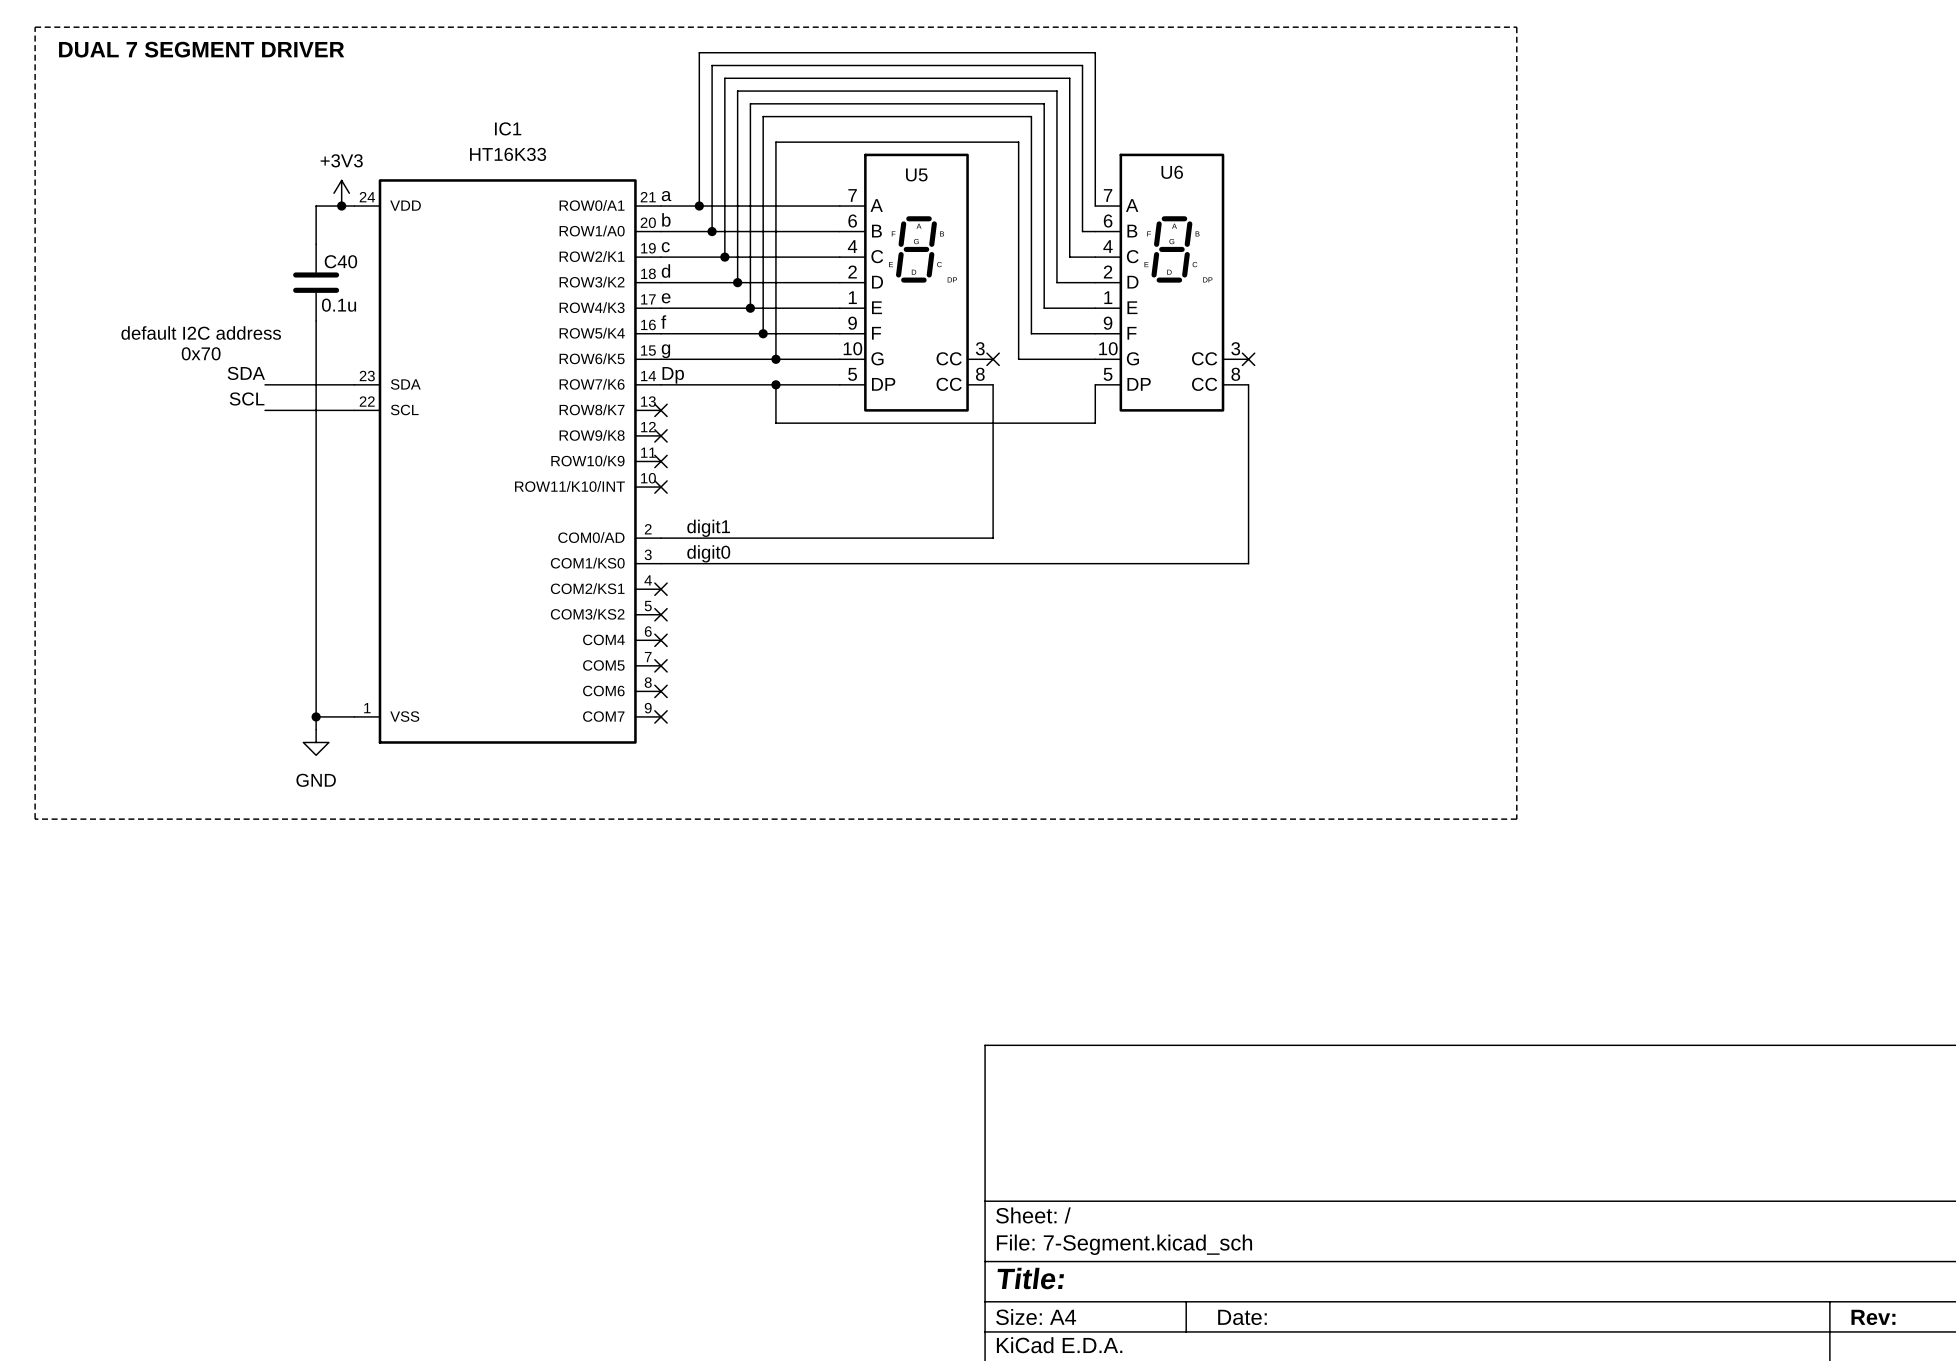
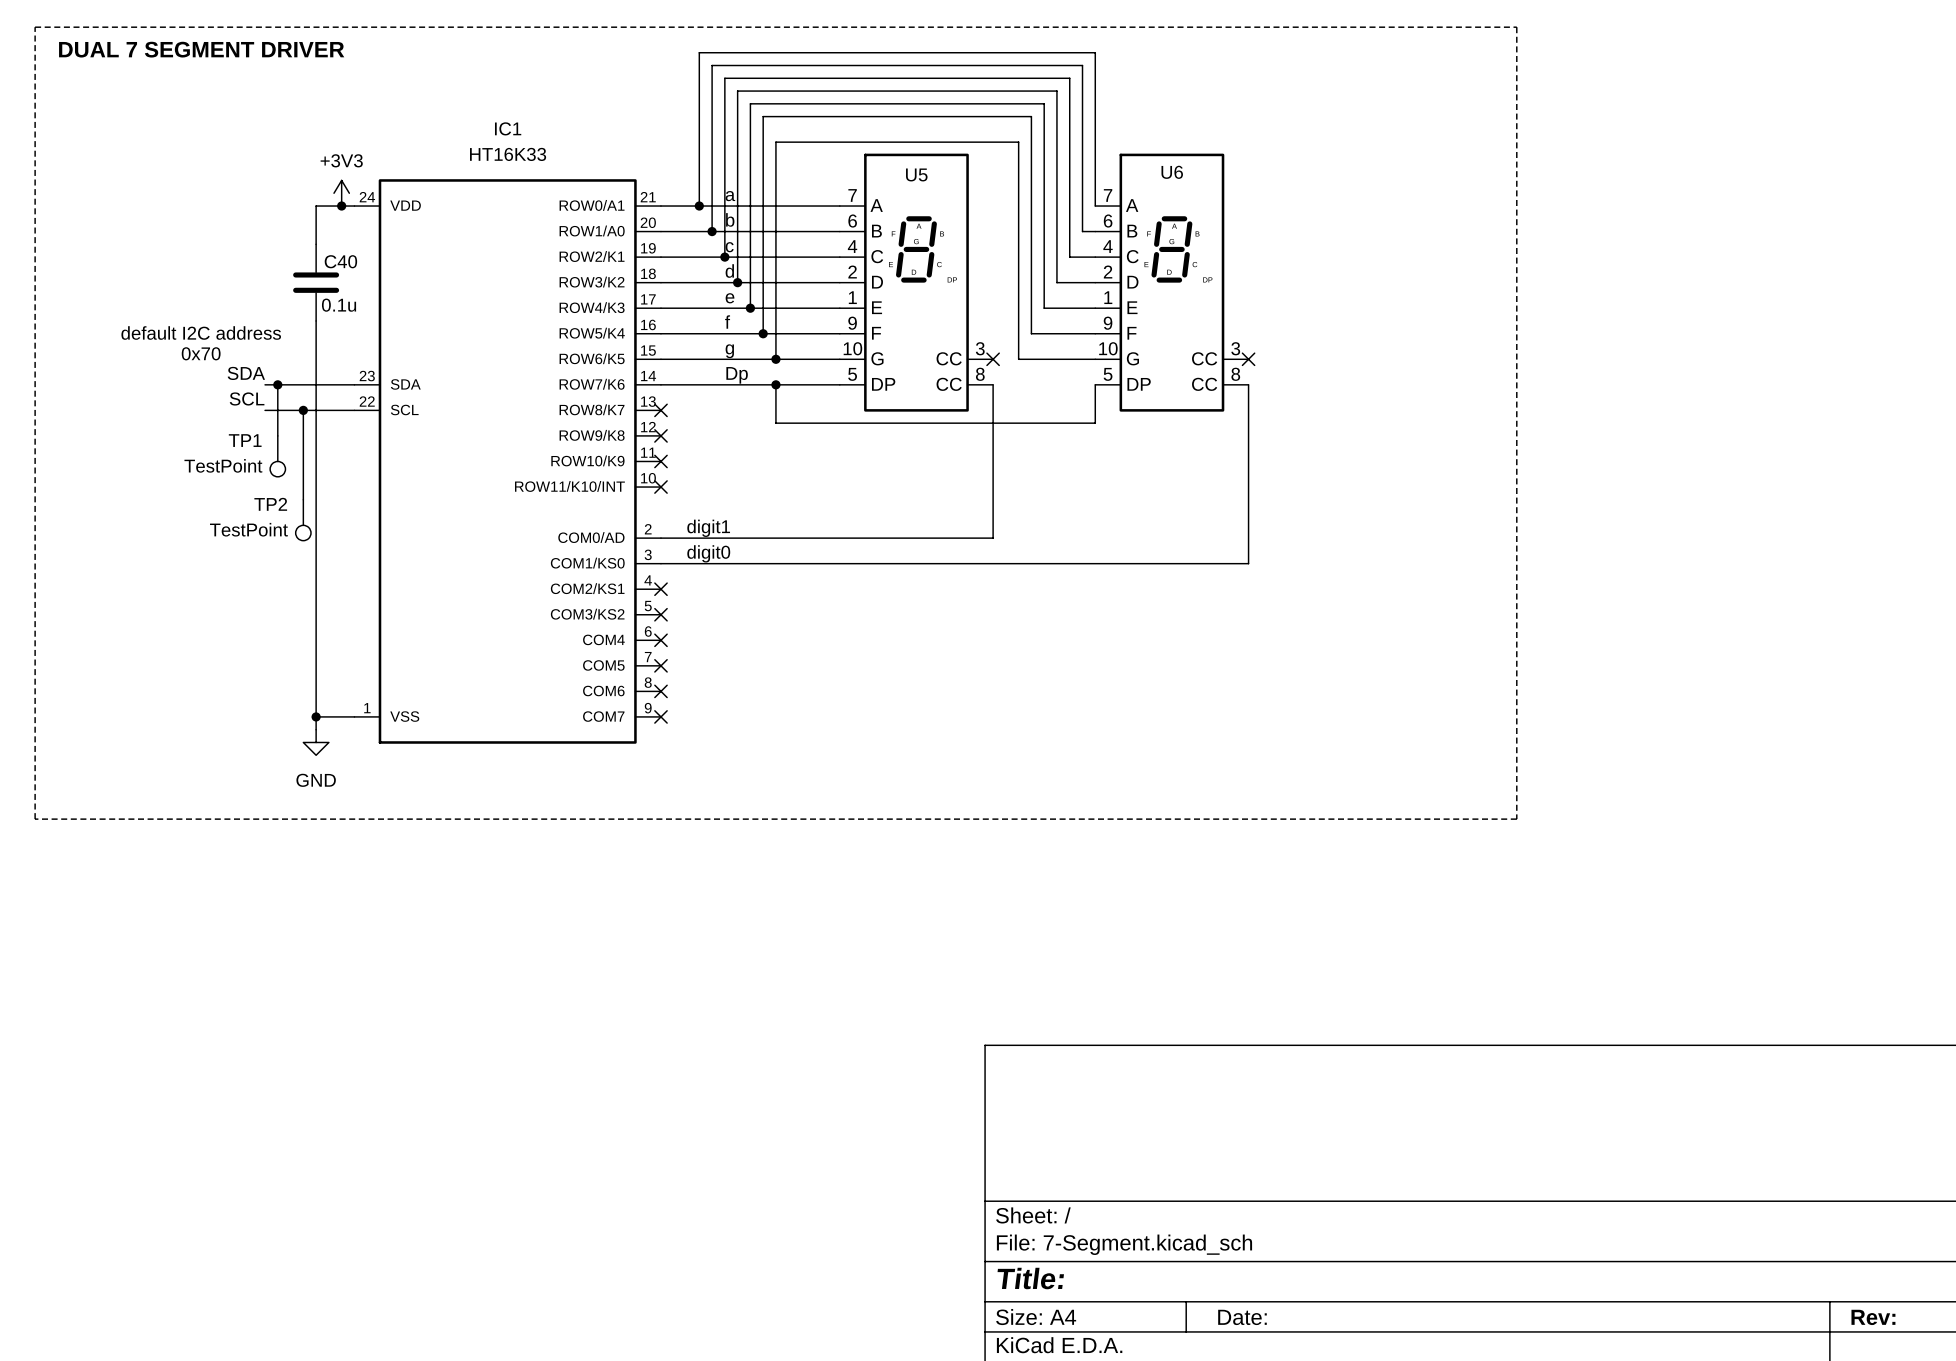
label position: a (666, 196) -> a (730, 196)
label position: b (666, 219) -> b (730, 219)
label position: c (665, 247) -> c (729, 247)
label position: d (665, 271) -> d (729, 271)
label position: e (666, 298) -> e (730, 298)
label position: f (663, 322) -> f (727, 322)
label position: g (665, 351) -> g (729, 351)
label position: Dp (673, 375) -> Dp (737, 375)
wire: none -> (277, 384) (277, 435)
junction: none -> (277, 384)
wire: none -> (303, 410) (303, 499)
junction: none -> (303, 410)
TP1: none -> TestPoint (277, 456)
TP2: none -> TestPoint (303, 520)

